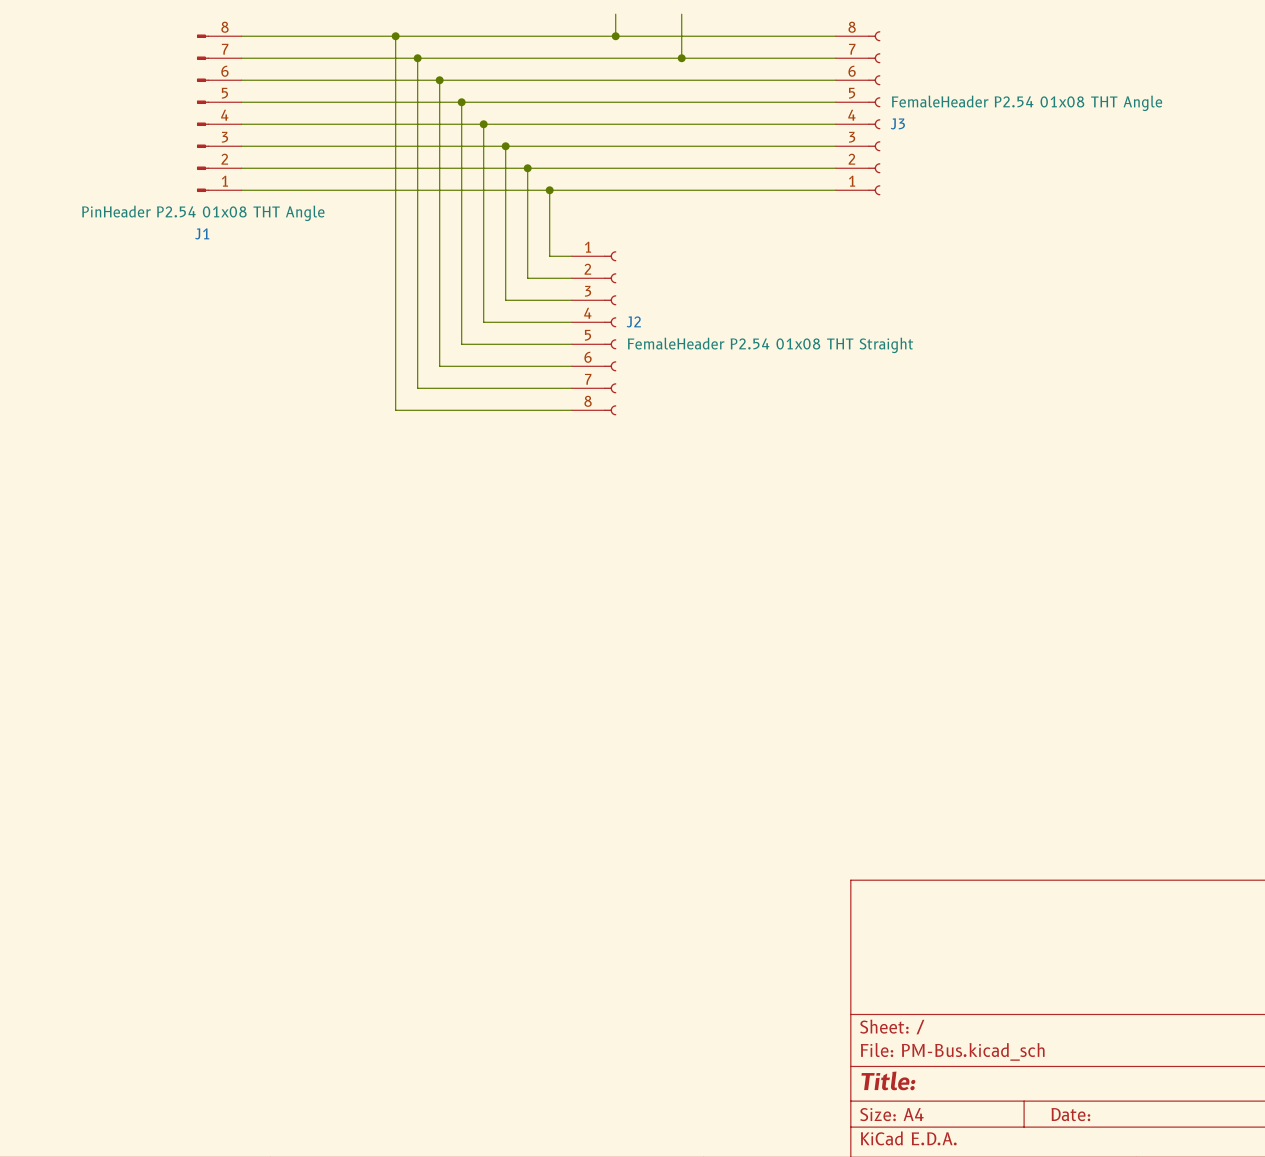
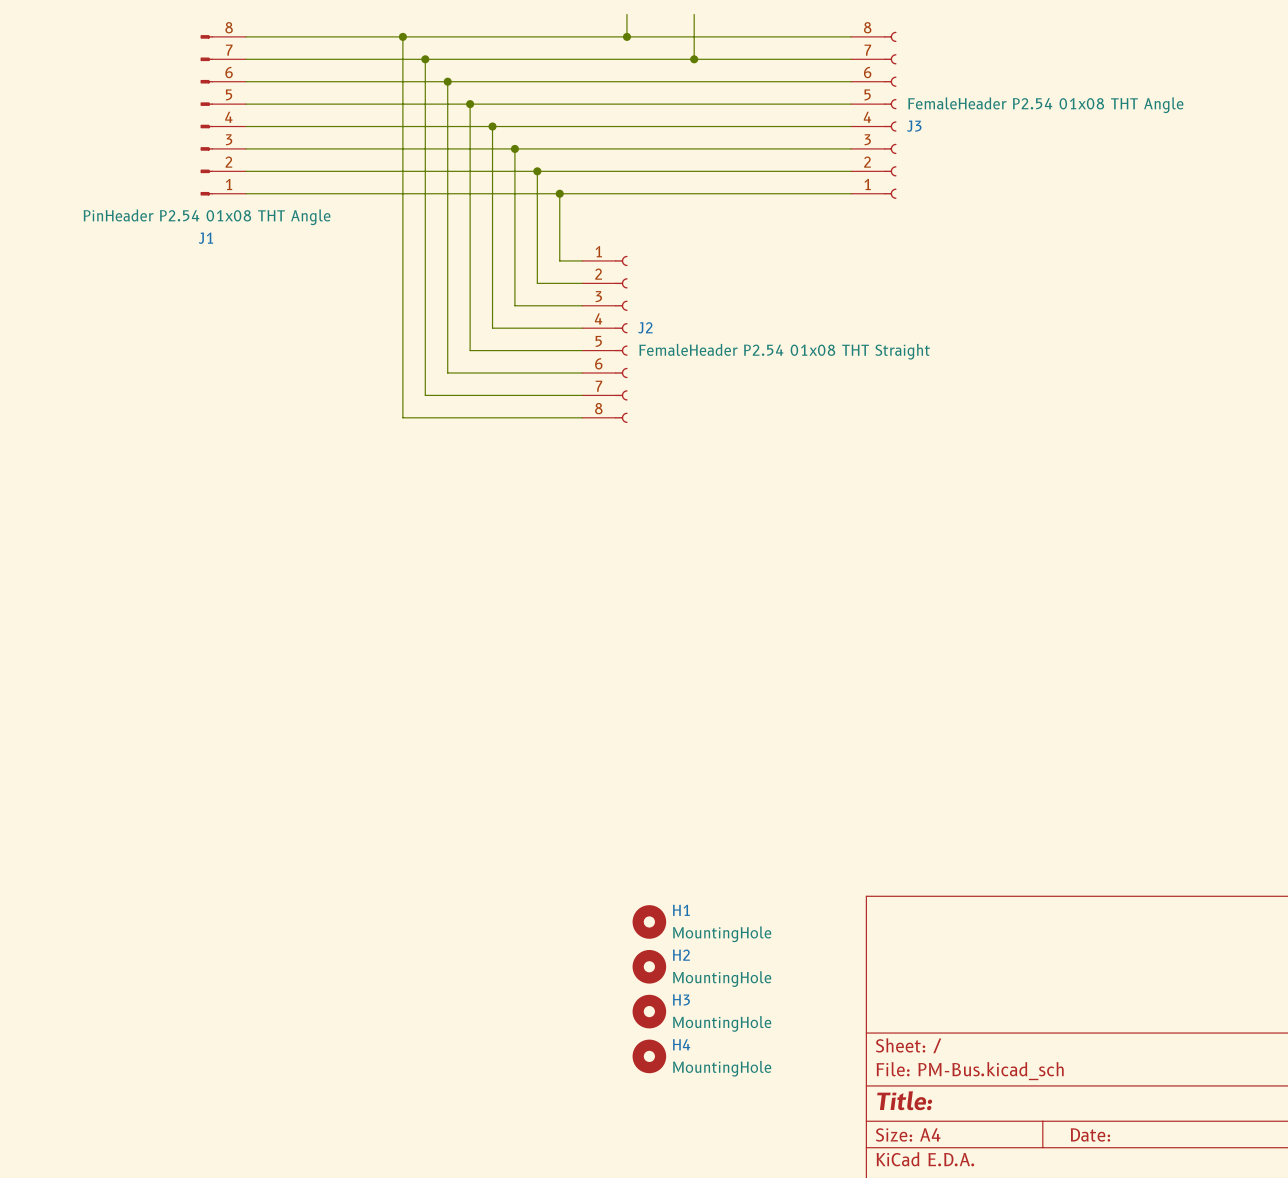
H1: none -> MountingHole (649, 921)
H2: none -> MountingHole (649, 966)
H3: none -> MountingHole (649, 1011)
H4: none -> MountingHole (649, 1056)

